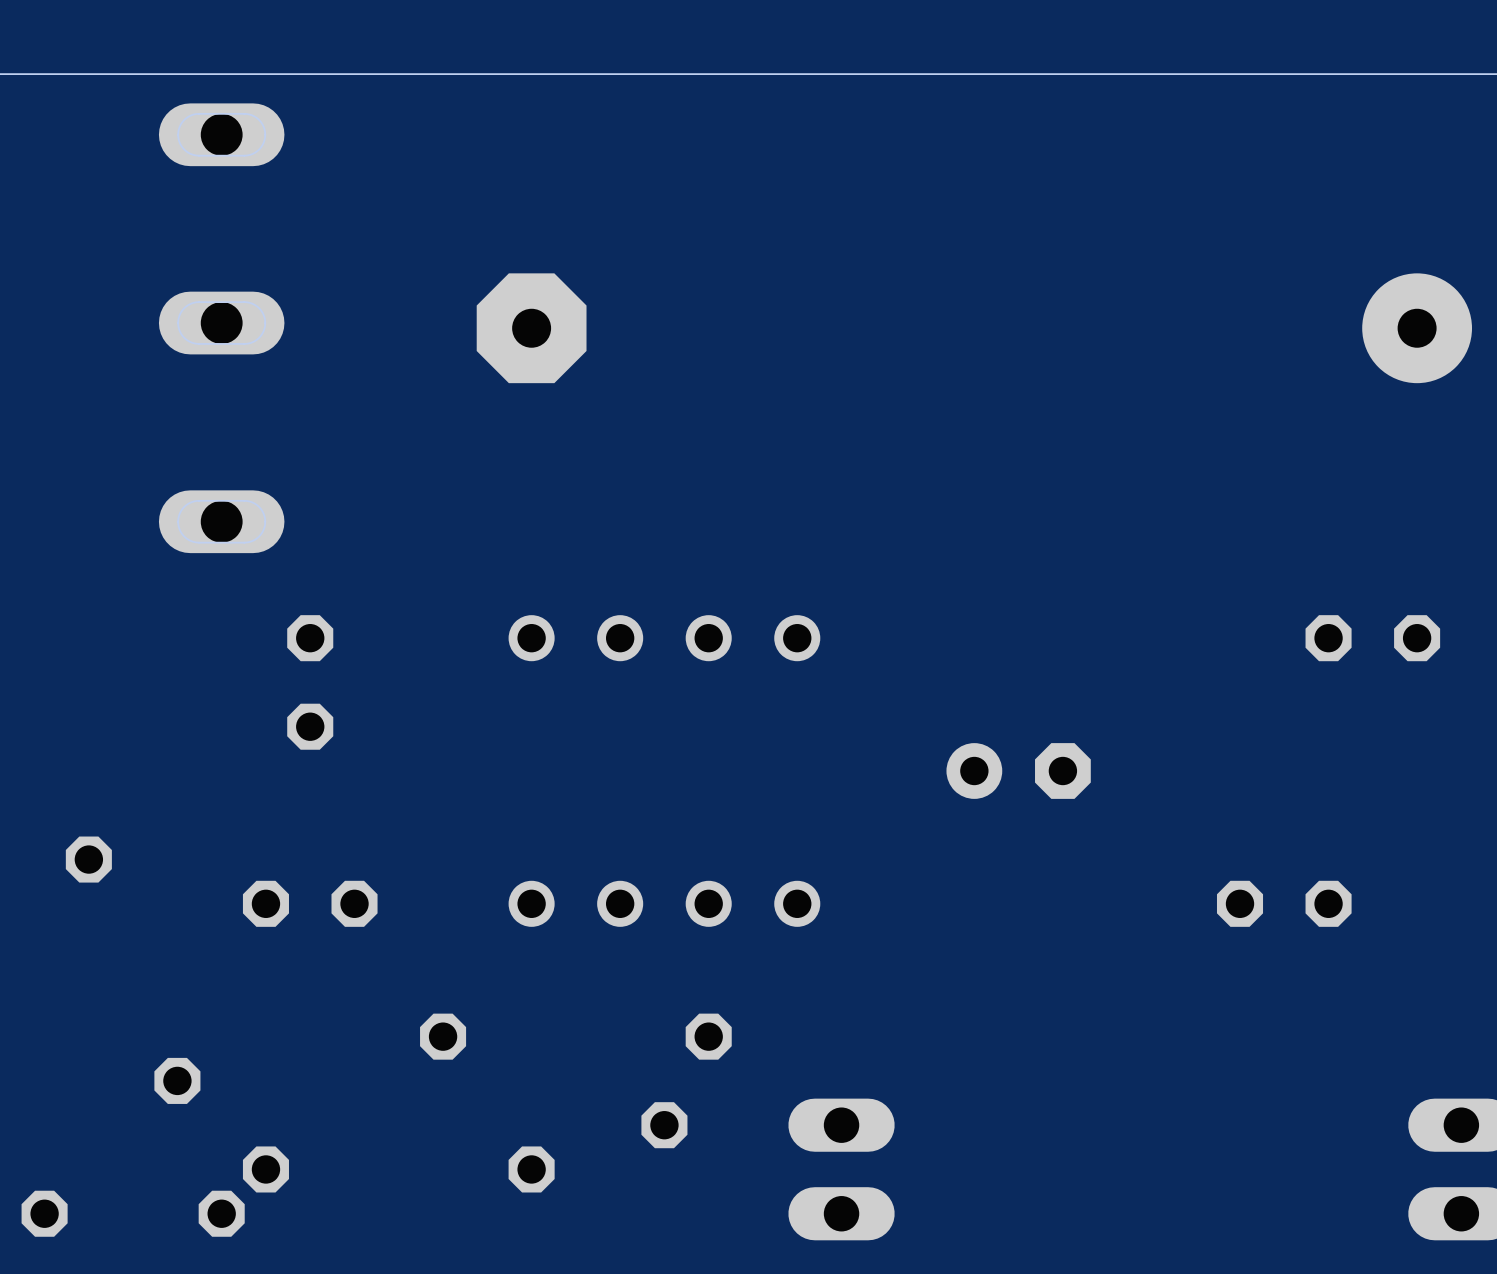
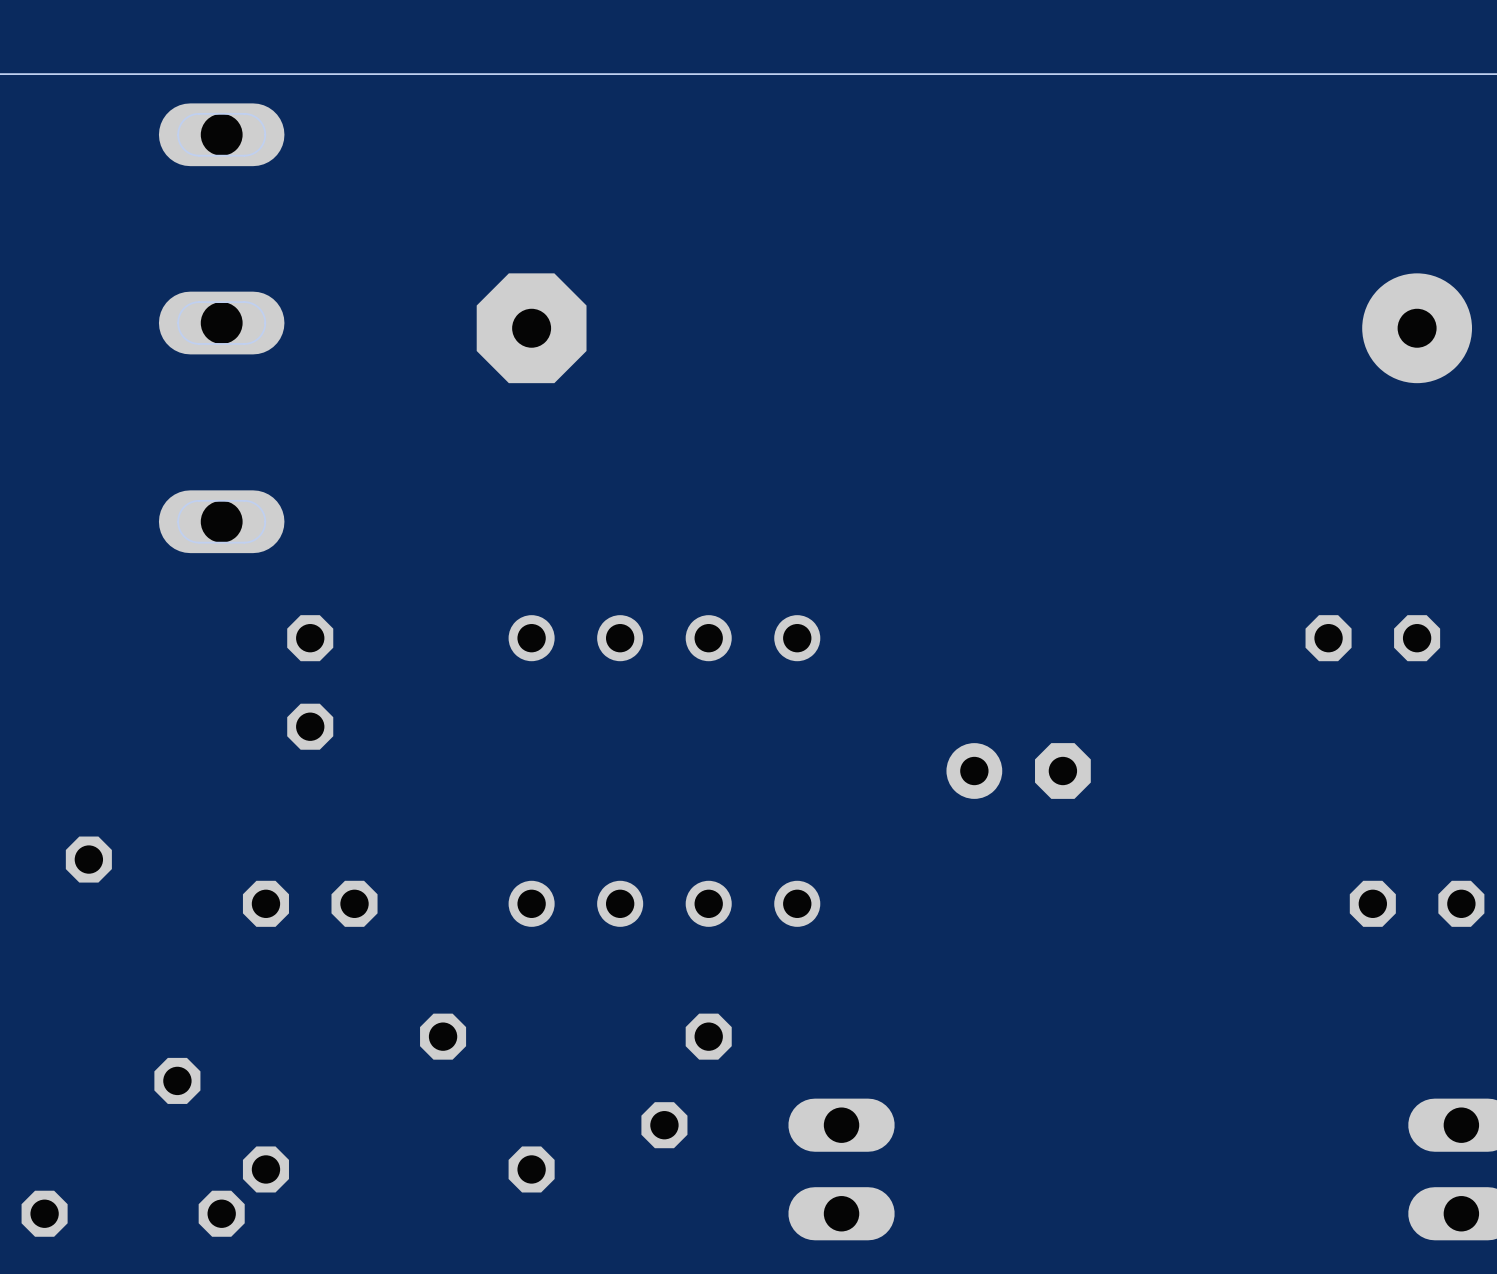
part position: (1284, 903) -> (1417, 903)

